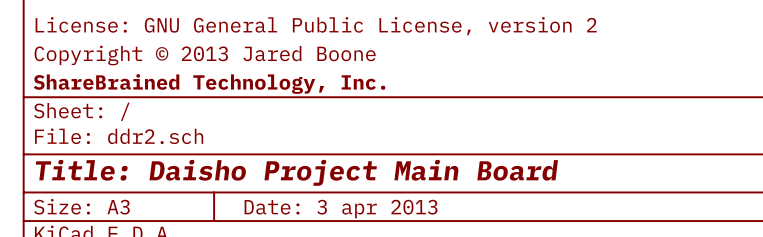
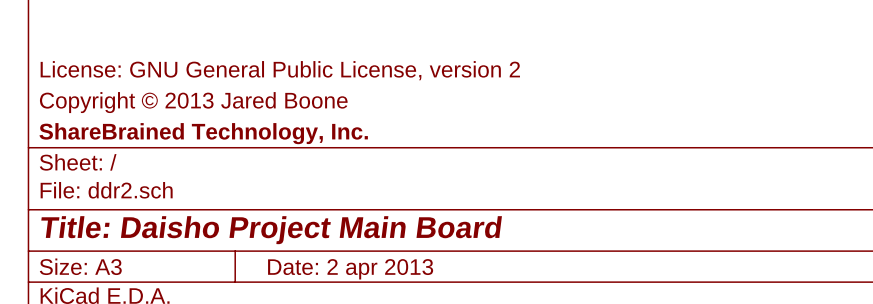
title block: Date: 3 apr 2013 (341, 209) -> Date: 2 apr 2013 (350, 269)

